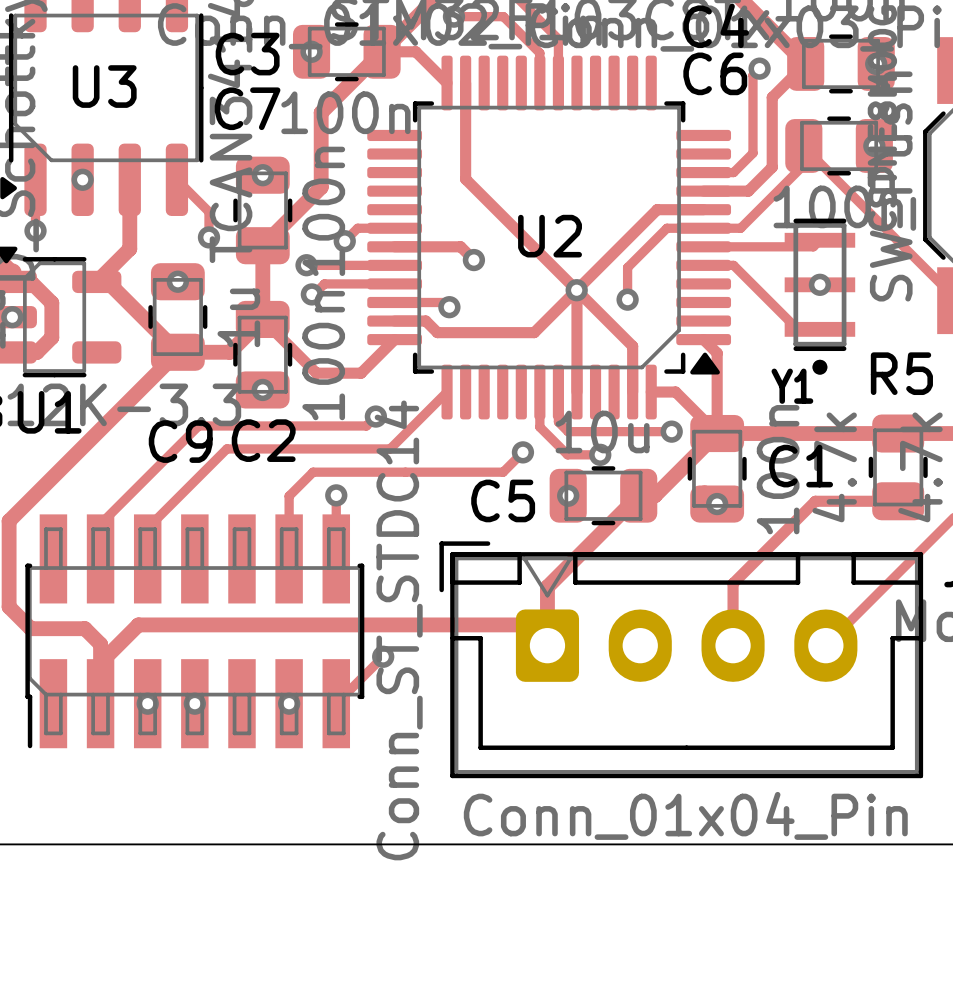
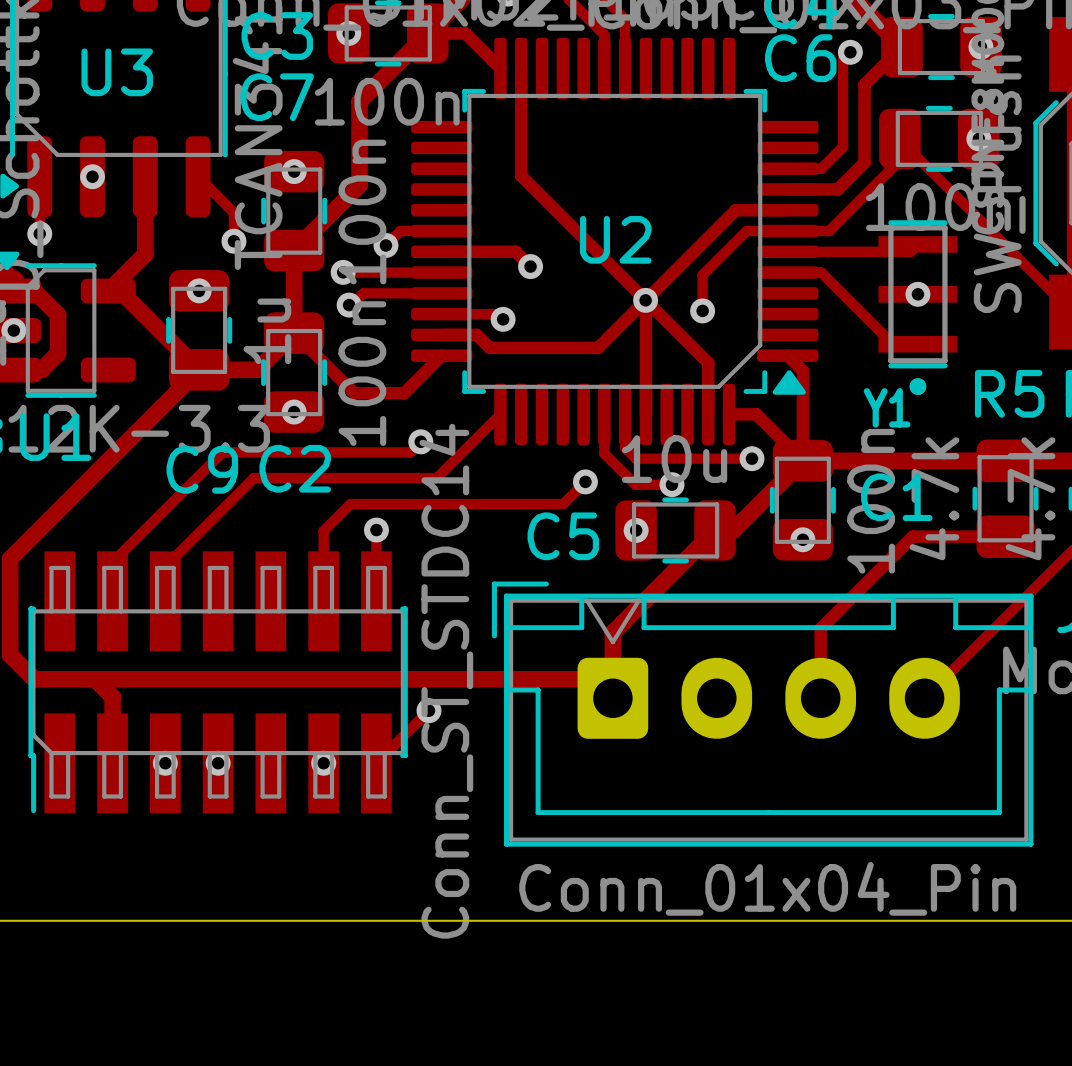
track: (530, 628) (526, 624) (138, 624) (100, 662) -> (593, 679) (95, 679)

